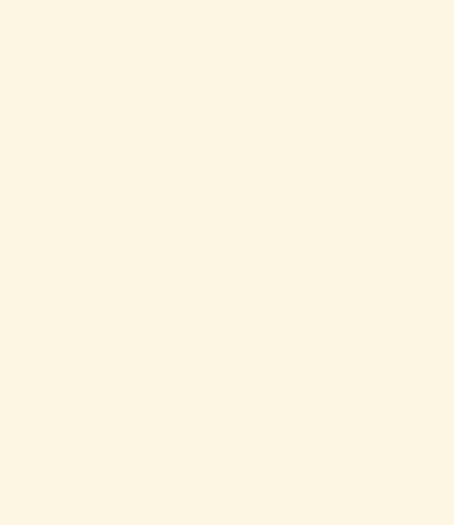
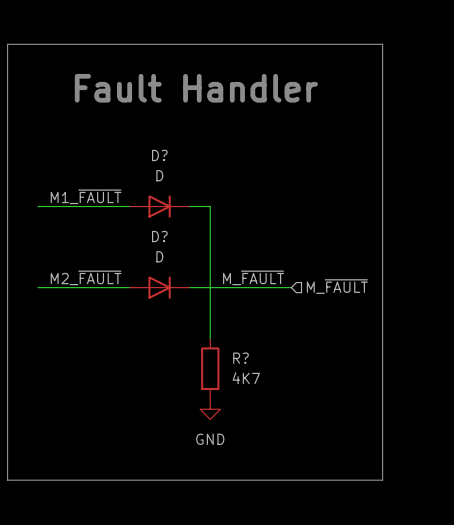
line: none -> (7, 44) (382, 44) (382, 480) (7, 480) (7, 44)
text: none -> Fault Handler (196, 88)
label: none -> M1_~{FAULT} (86, 196)
wire: none -> (37, 206) (129, 206)
D?: none -> D (159, 206)
wire: none -> (189, 206) (210, 206) (210, 338)
label: none -> M2_~{FAULT} (86, 277)
label: none -> M_~{FAULT} (253, 277)
wire: none -> (37, 287) (129, 287)
D?: none -> D (159, 287)
wire: none -> (189, 287) (291, 287)
hierarchical label: none -> M_~{FAULT} (337, 286)
R?: none -> 4K7 (210, 368)
power symbol: none -> GND (210, 409)

